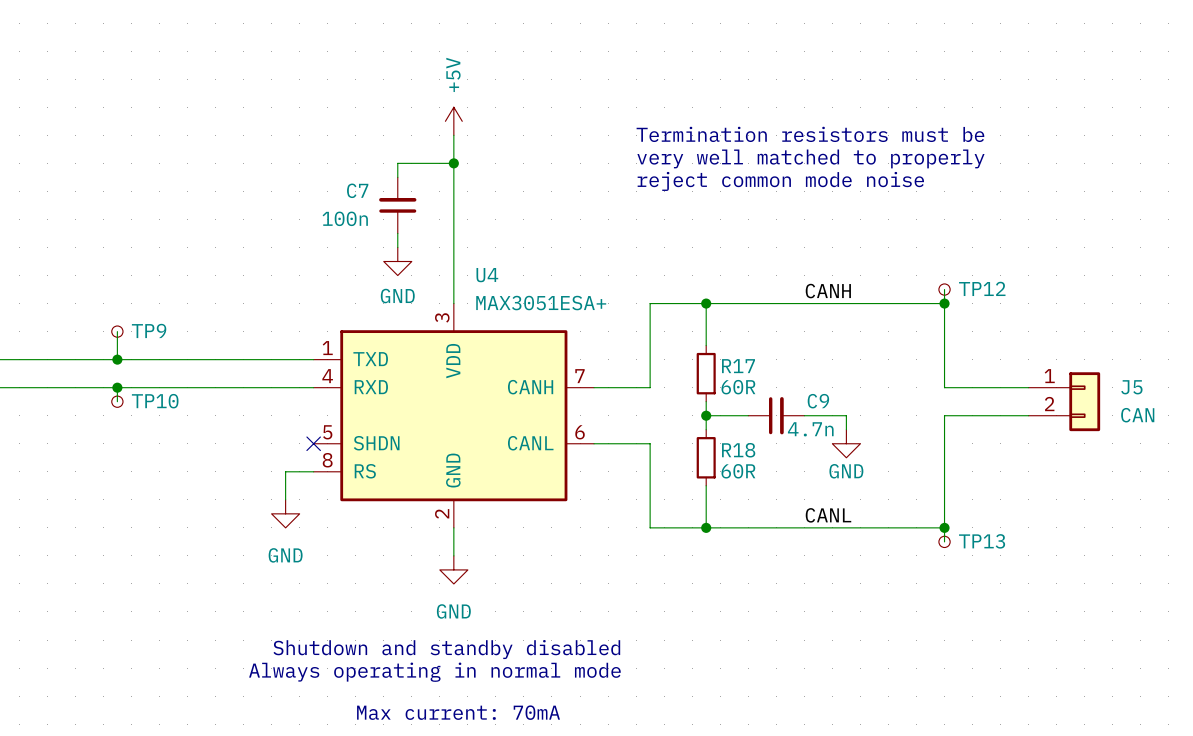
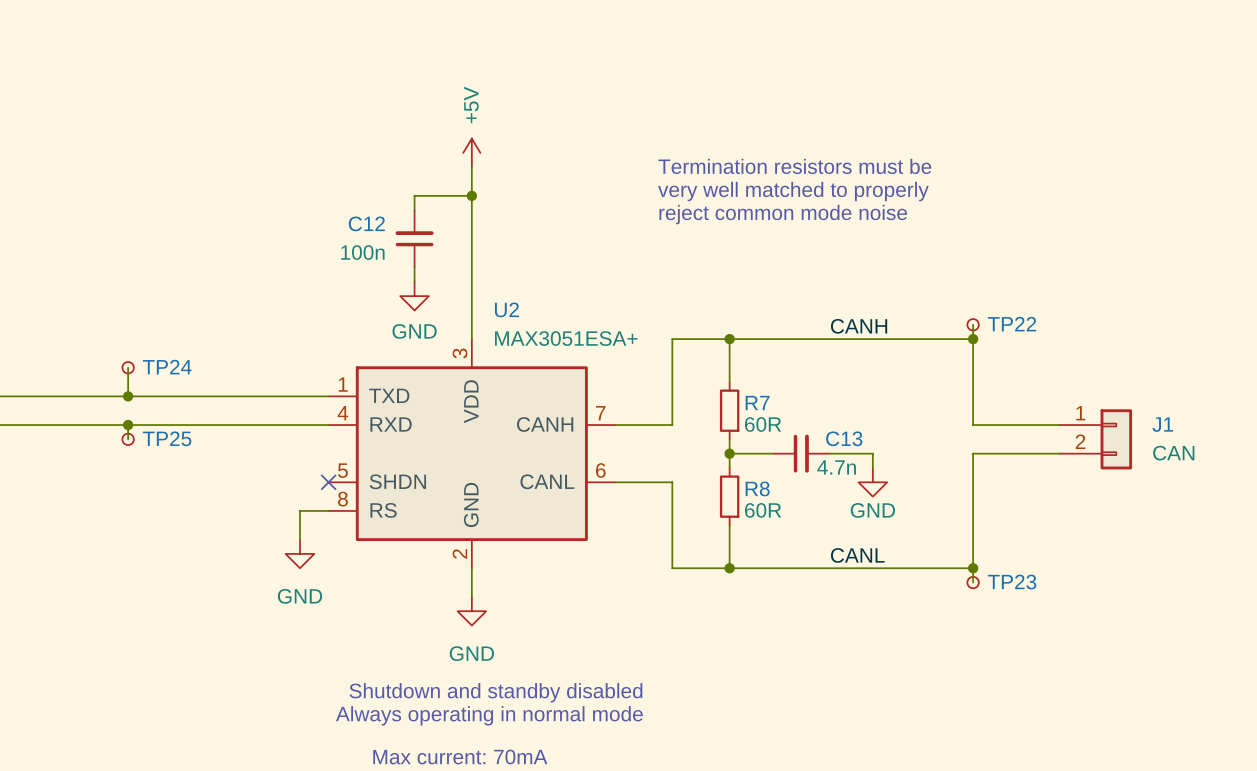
C7 name: C7 (357, 190) -> C12 (366, 223)
U4 name: U4 (487, 275) -> U2 (506, 309)
TP12 name: TP12 (982, 288) -> TP22 (1012, 324)
TP9 name: TP9 (149, 330) -> TP24 (167, 367)
R17 name: R17 (738, 366) -> R7 (757, 403)
J5 name: J5 (1131, 387) -> J1 (1162, 424)
TP10 name: TP10 (155, 401) -> TP25 (167, 438)
C9 name: C9 (818, 401) -> C13 (844, 438)
R18 name: R18 (738, 450) -> R8 (757, 488)
TP13 name: TP13 (982, 541) -> TP23 (1012, 582)

